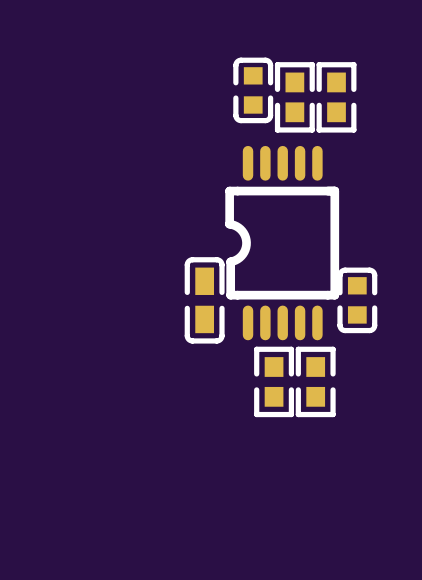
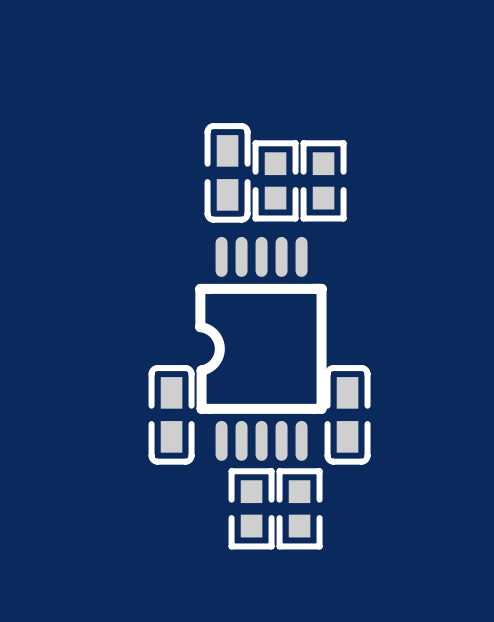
part footprint: [233, 57, 274, 124] -> [204, 123, 251, 223]
part footprint: [337, 267, 378, 334] -> [324, 365, 371, 465]

